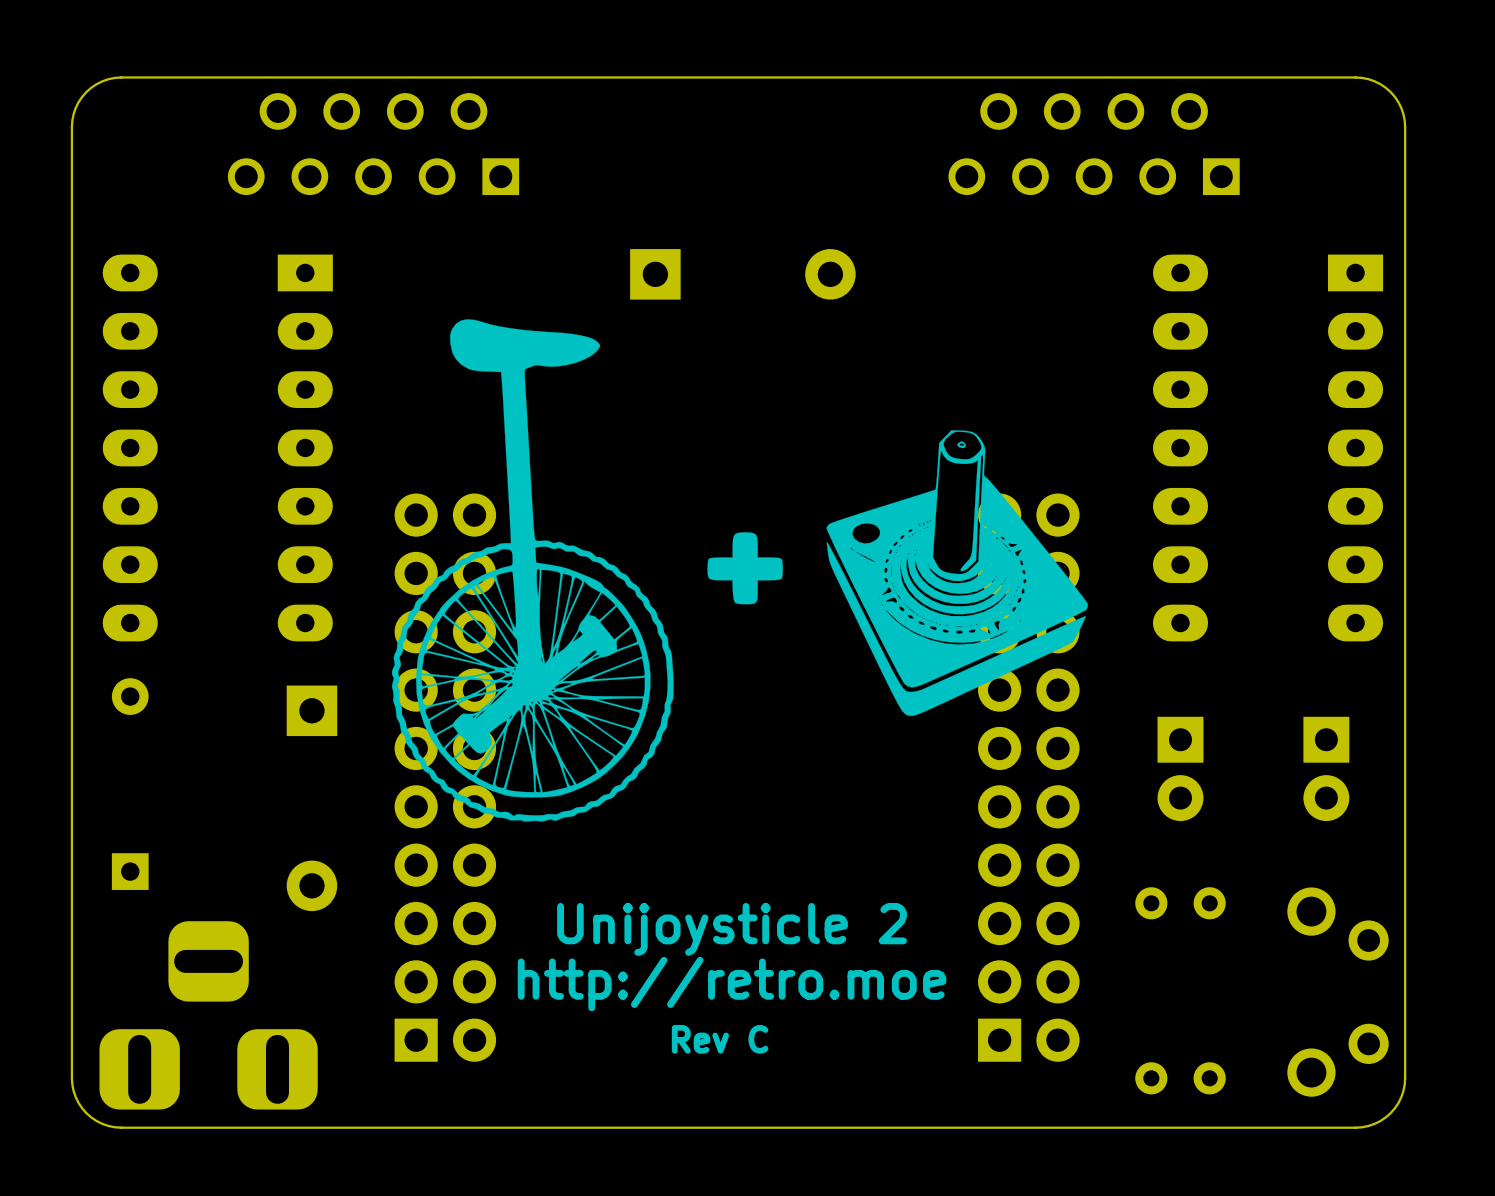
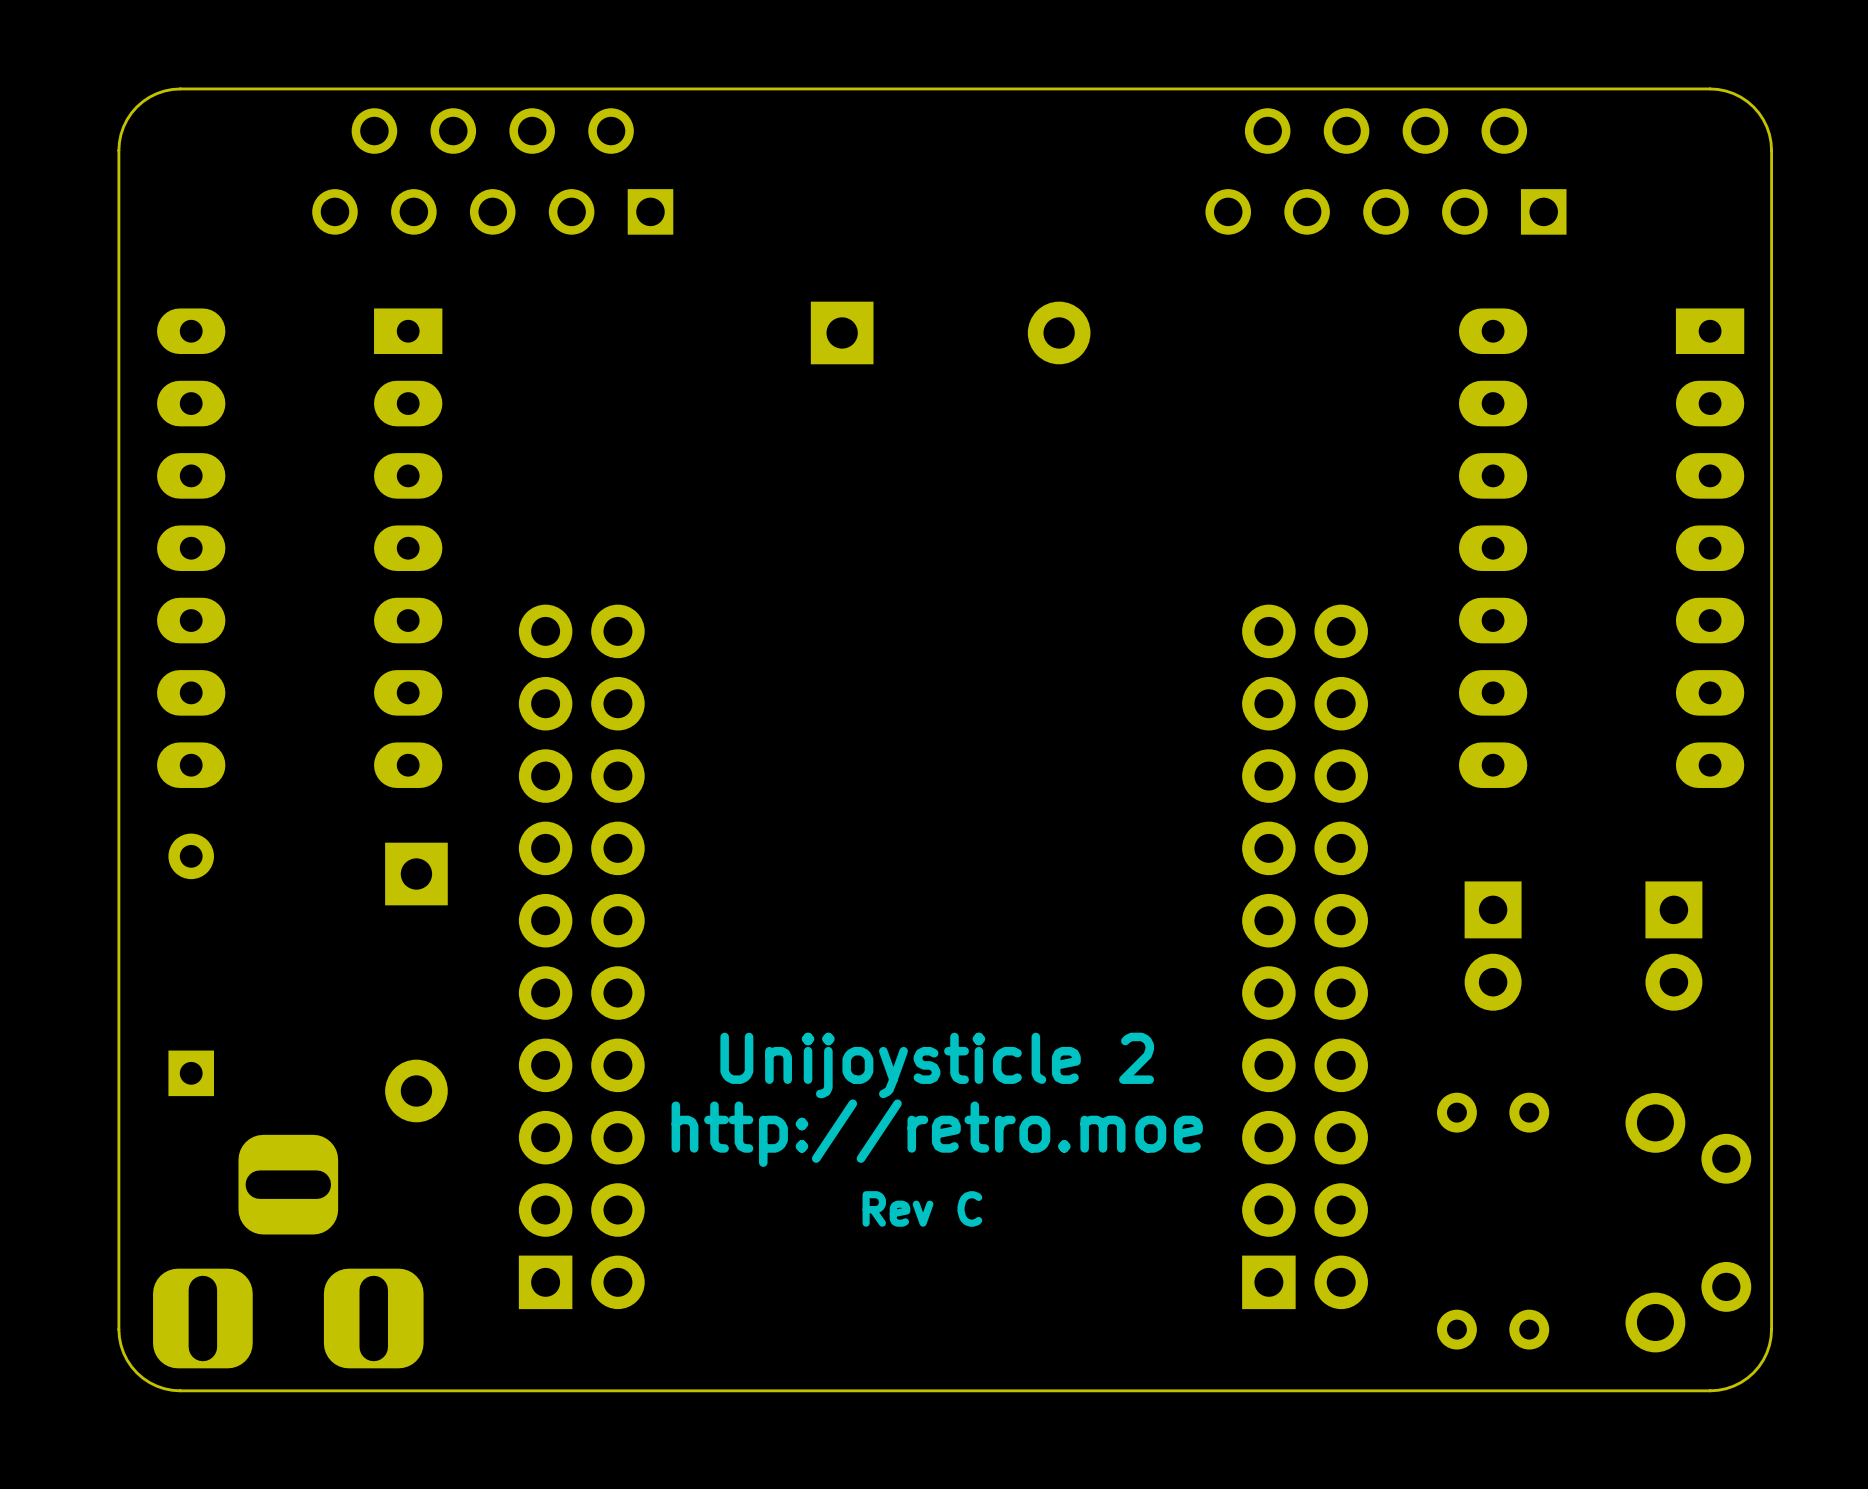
drawing: [391, 319, 1088, 822] -> none
text: none -> Unijoysticle 2 (937, 1065)
text: Unijoysticle 2 (732, 929) -> http://retro.moe (937, 1133)
text: http://retro.moe (732, 984) -> Rev C (922, 1208)
text: Rev C (720, 1039) -> none

